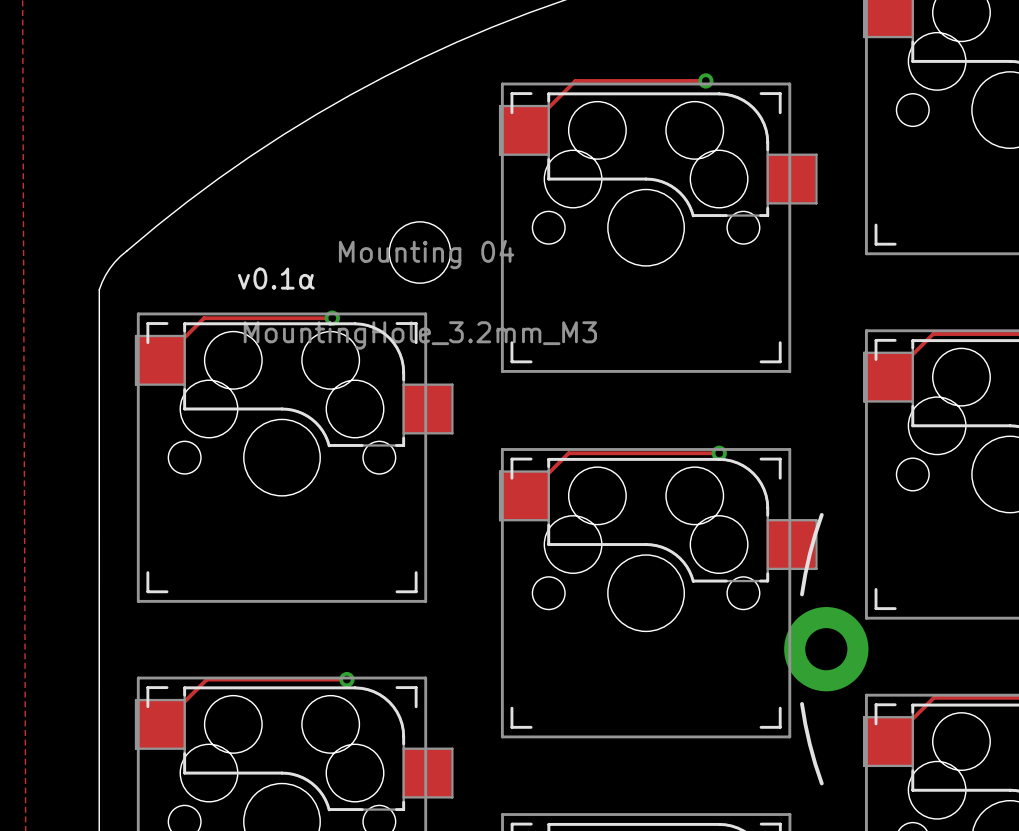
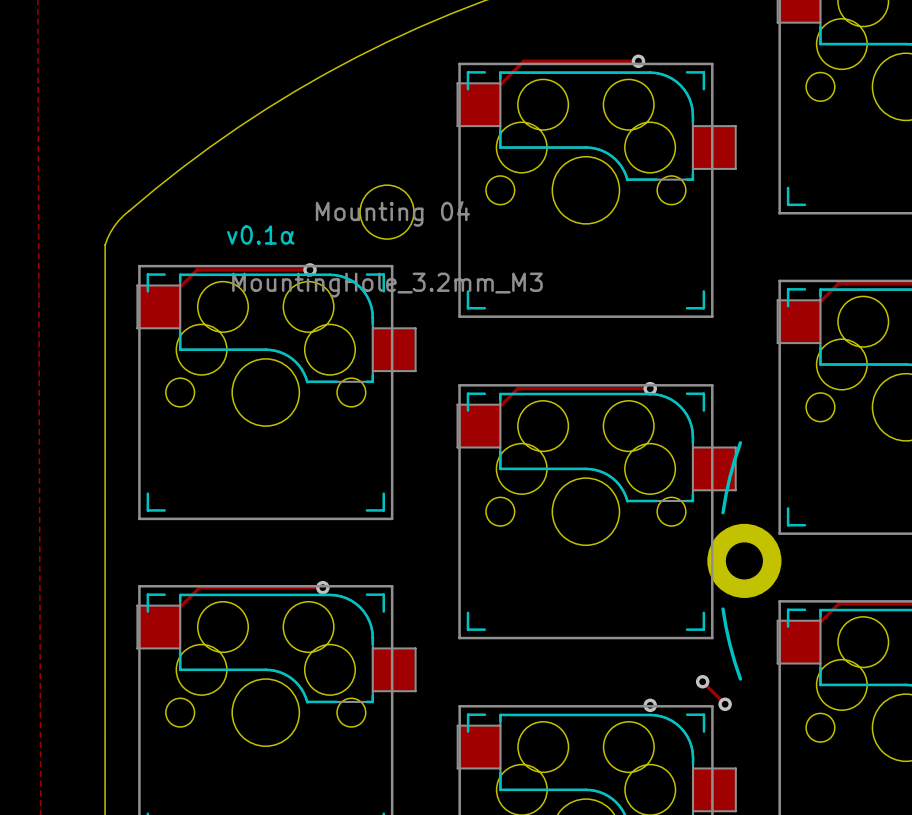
track: none -> (702, 681) (725, 704)
via: none -> (702, 681)
via: none -> (725, 704)
via: none -> (650, 705)

